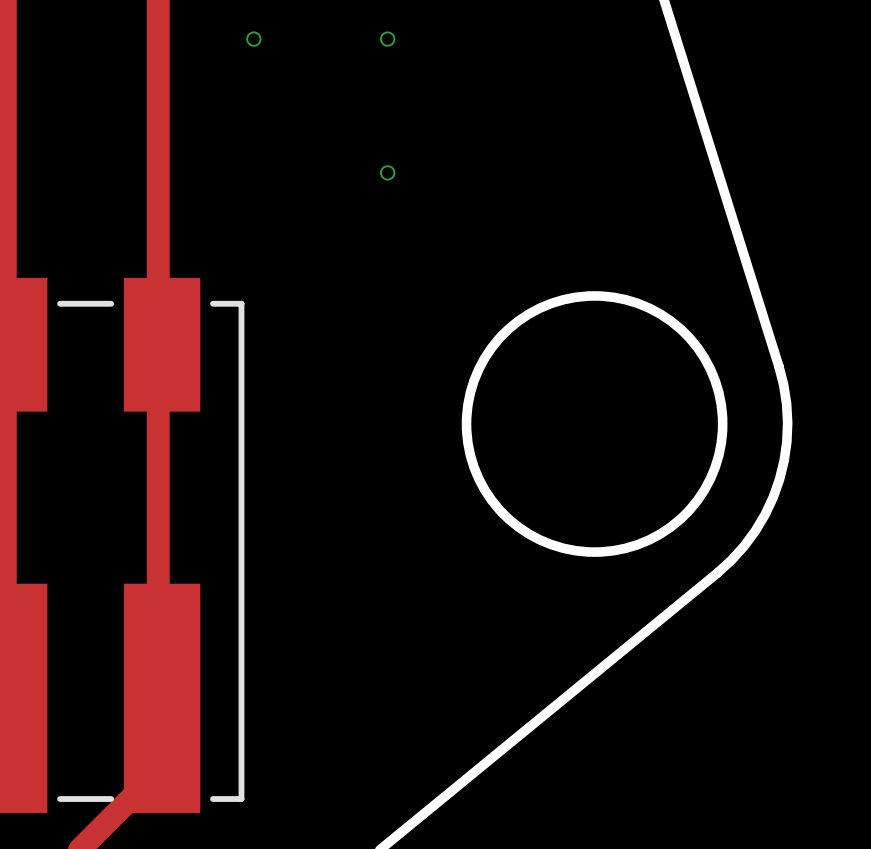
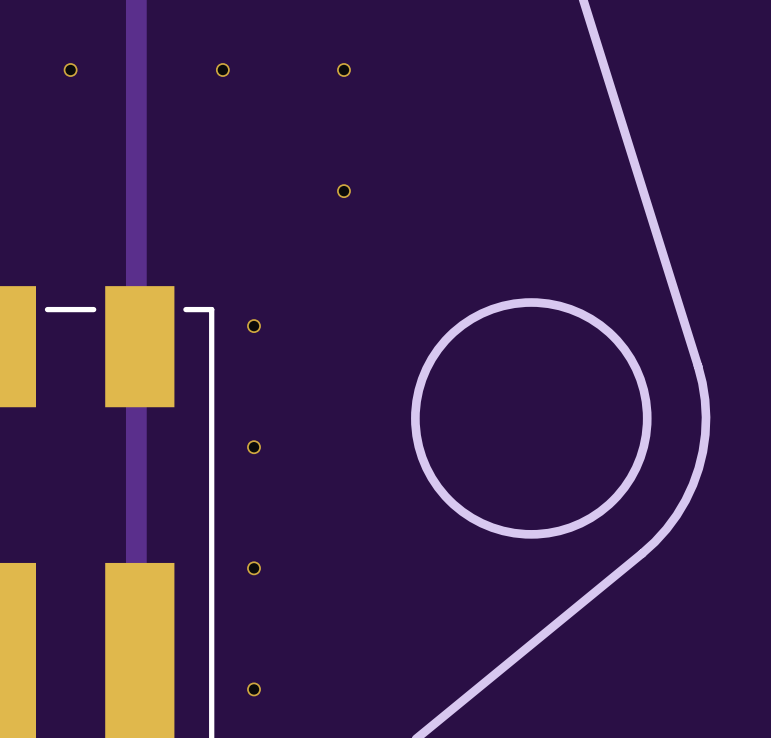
via: none -> (70, 70)
via: none -> (254, 326)
via: none -> (254, 447)
via: none -> (254, 568)
via: none -> (254, 689)

